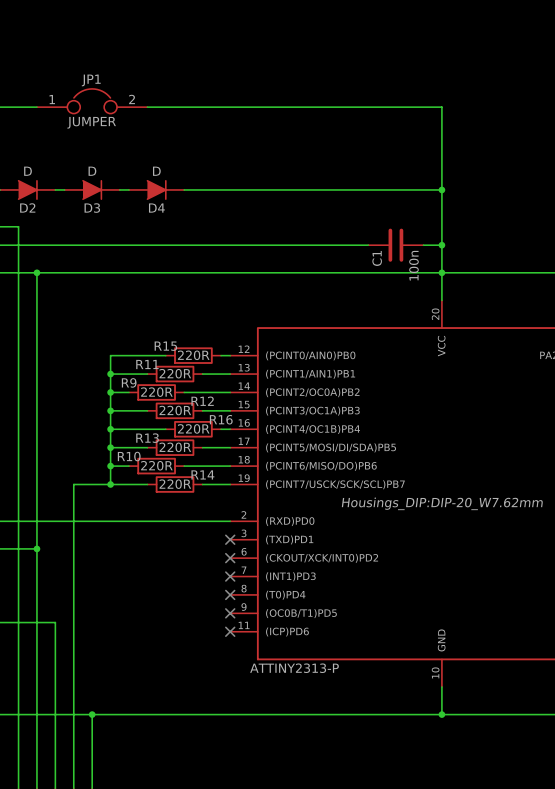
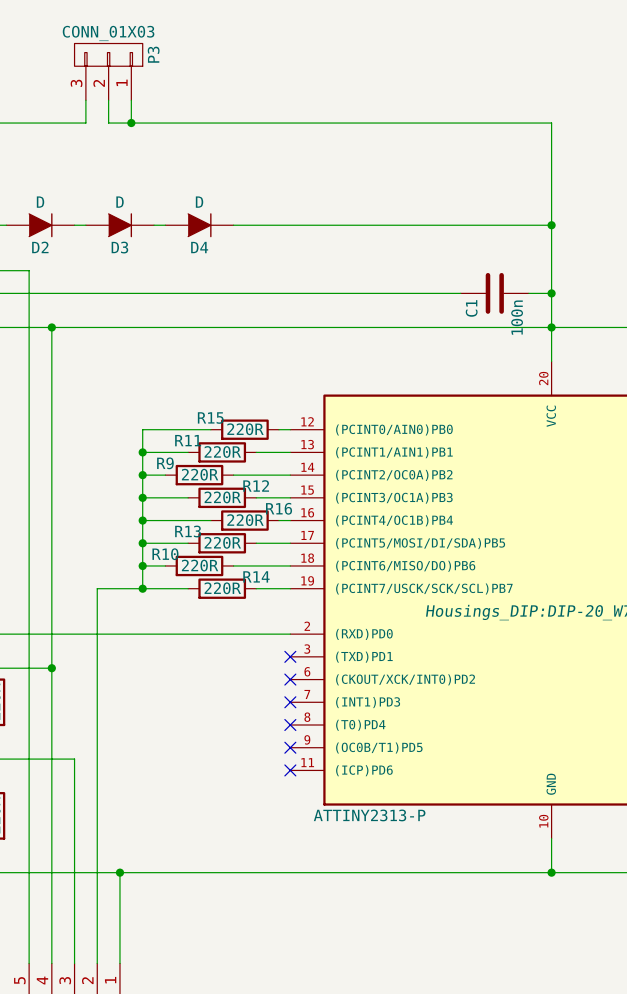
P3: none -> CONN_01X03 (108, 71)
wire: none -> (85, 100) (85, 123) (51, 123)
wire: none -> (108, 100) (108, 123) (188, 123)
wire: none -> (131, 100) (131, 123)
JP1: JUMPER (92, 101) -> none
junction: none -> (131, 123)

